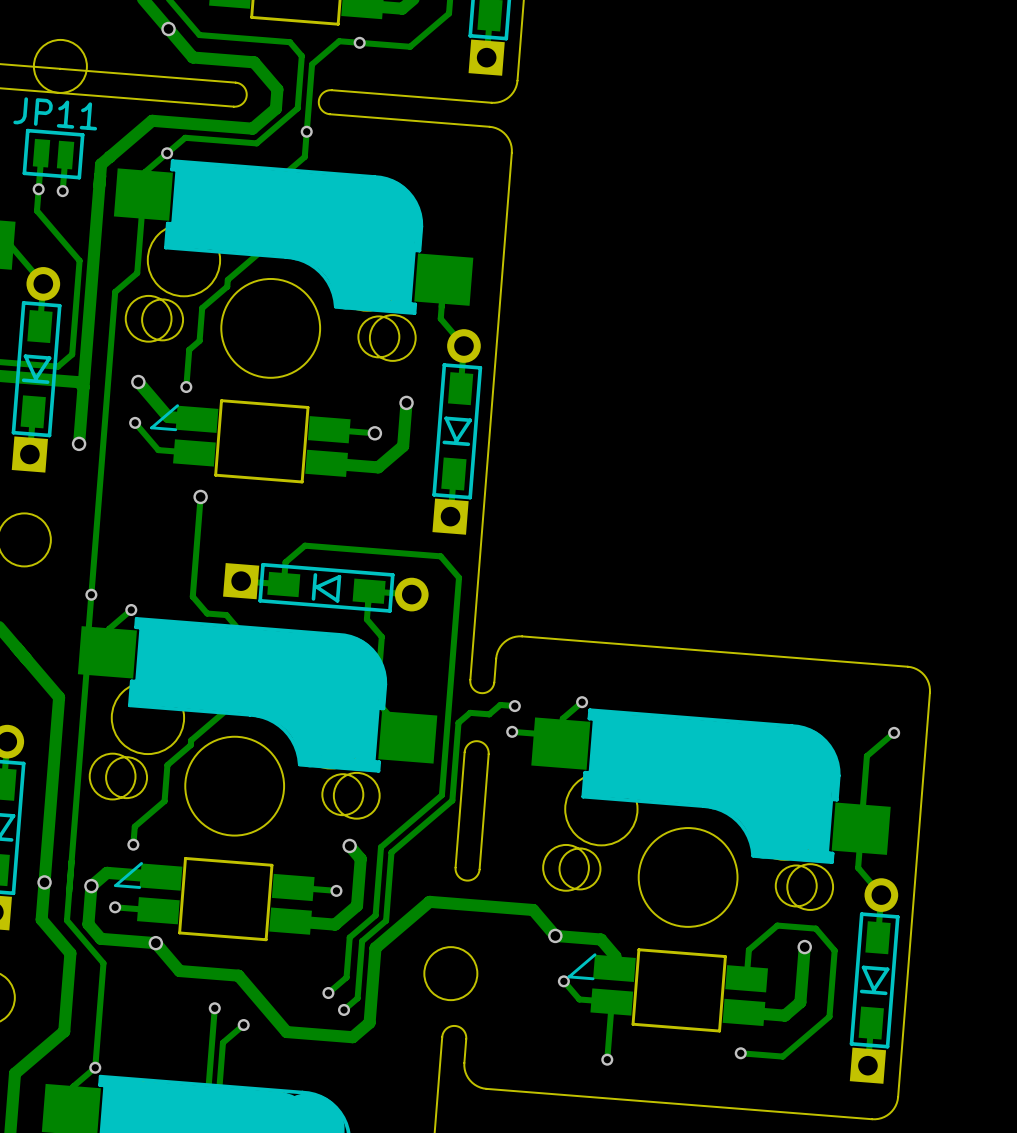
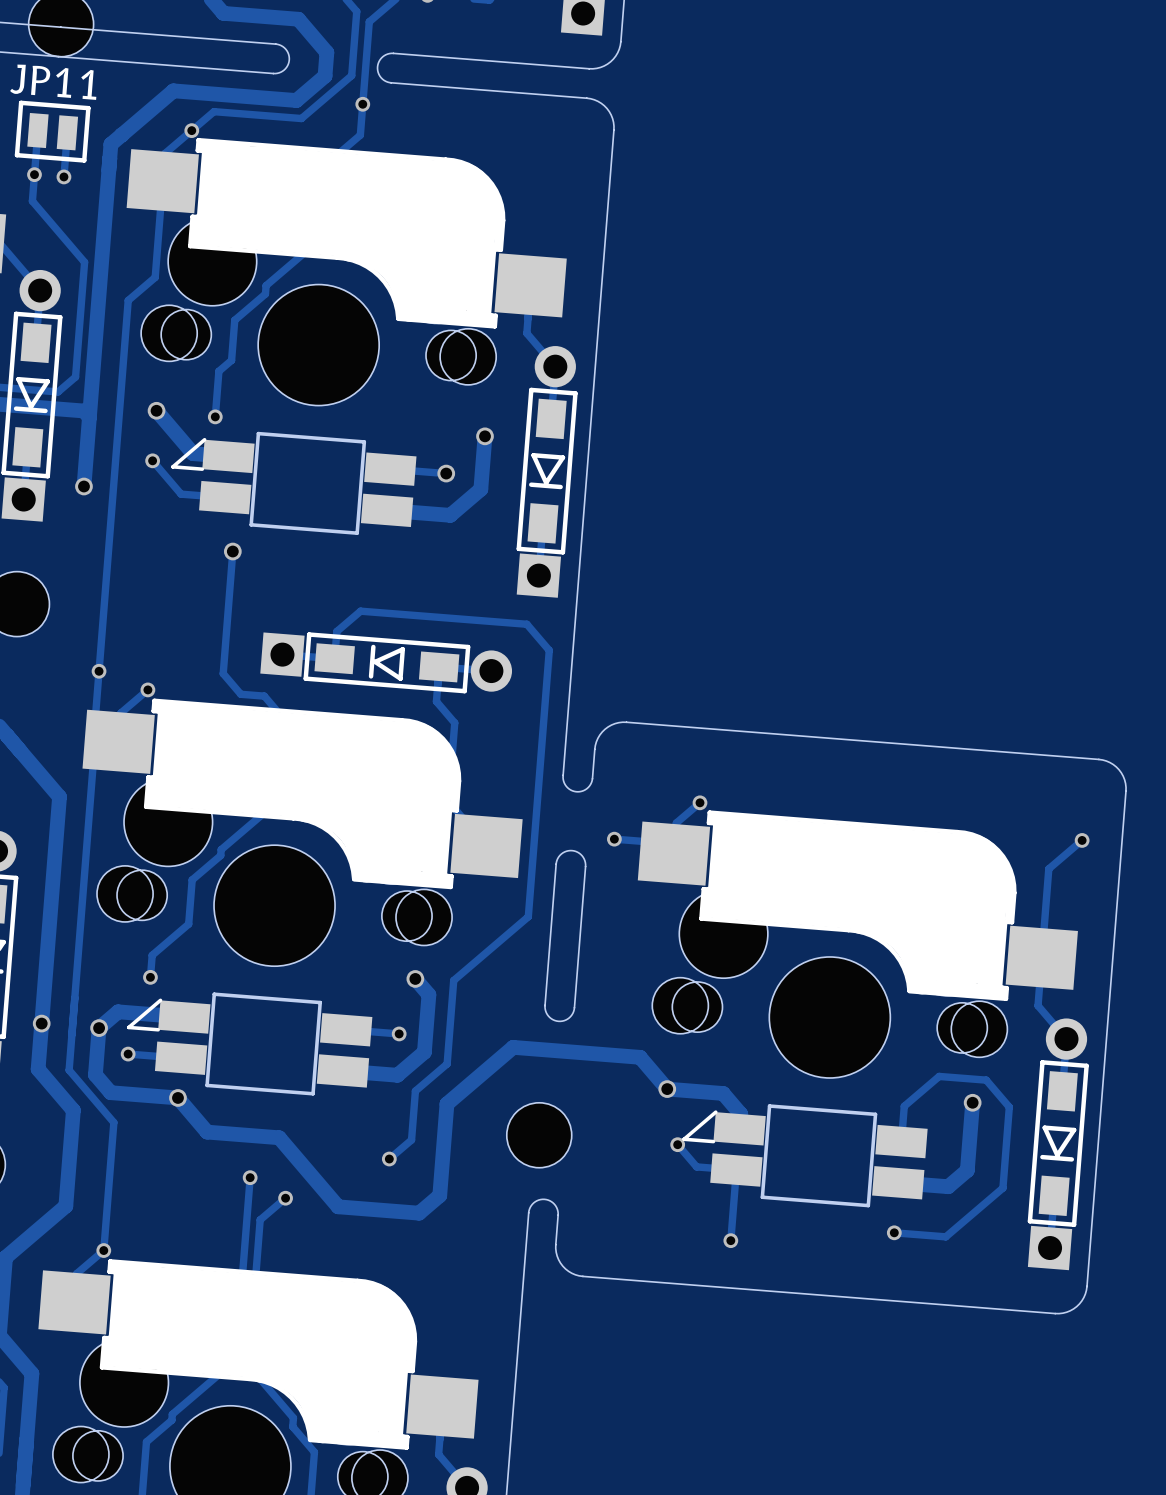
track: (514, 706) (500, 704) (489, 714) (470, 712) (458, 722) (452, 800) (391, 852) (386, 920) (362, 941) (357, 998) (344, 1009) -> none
via: (514, 706) -> none
via: (344, 1009) -> none

